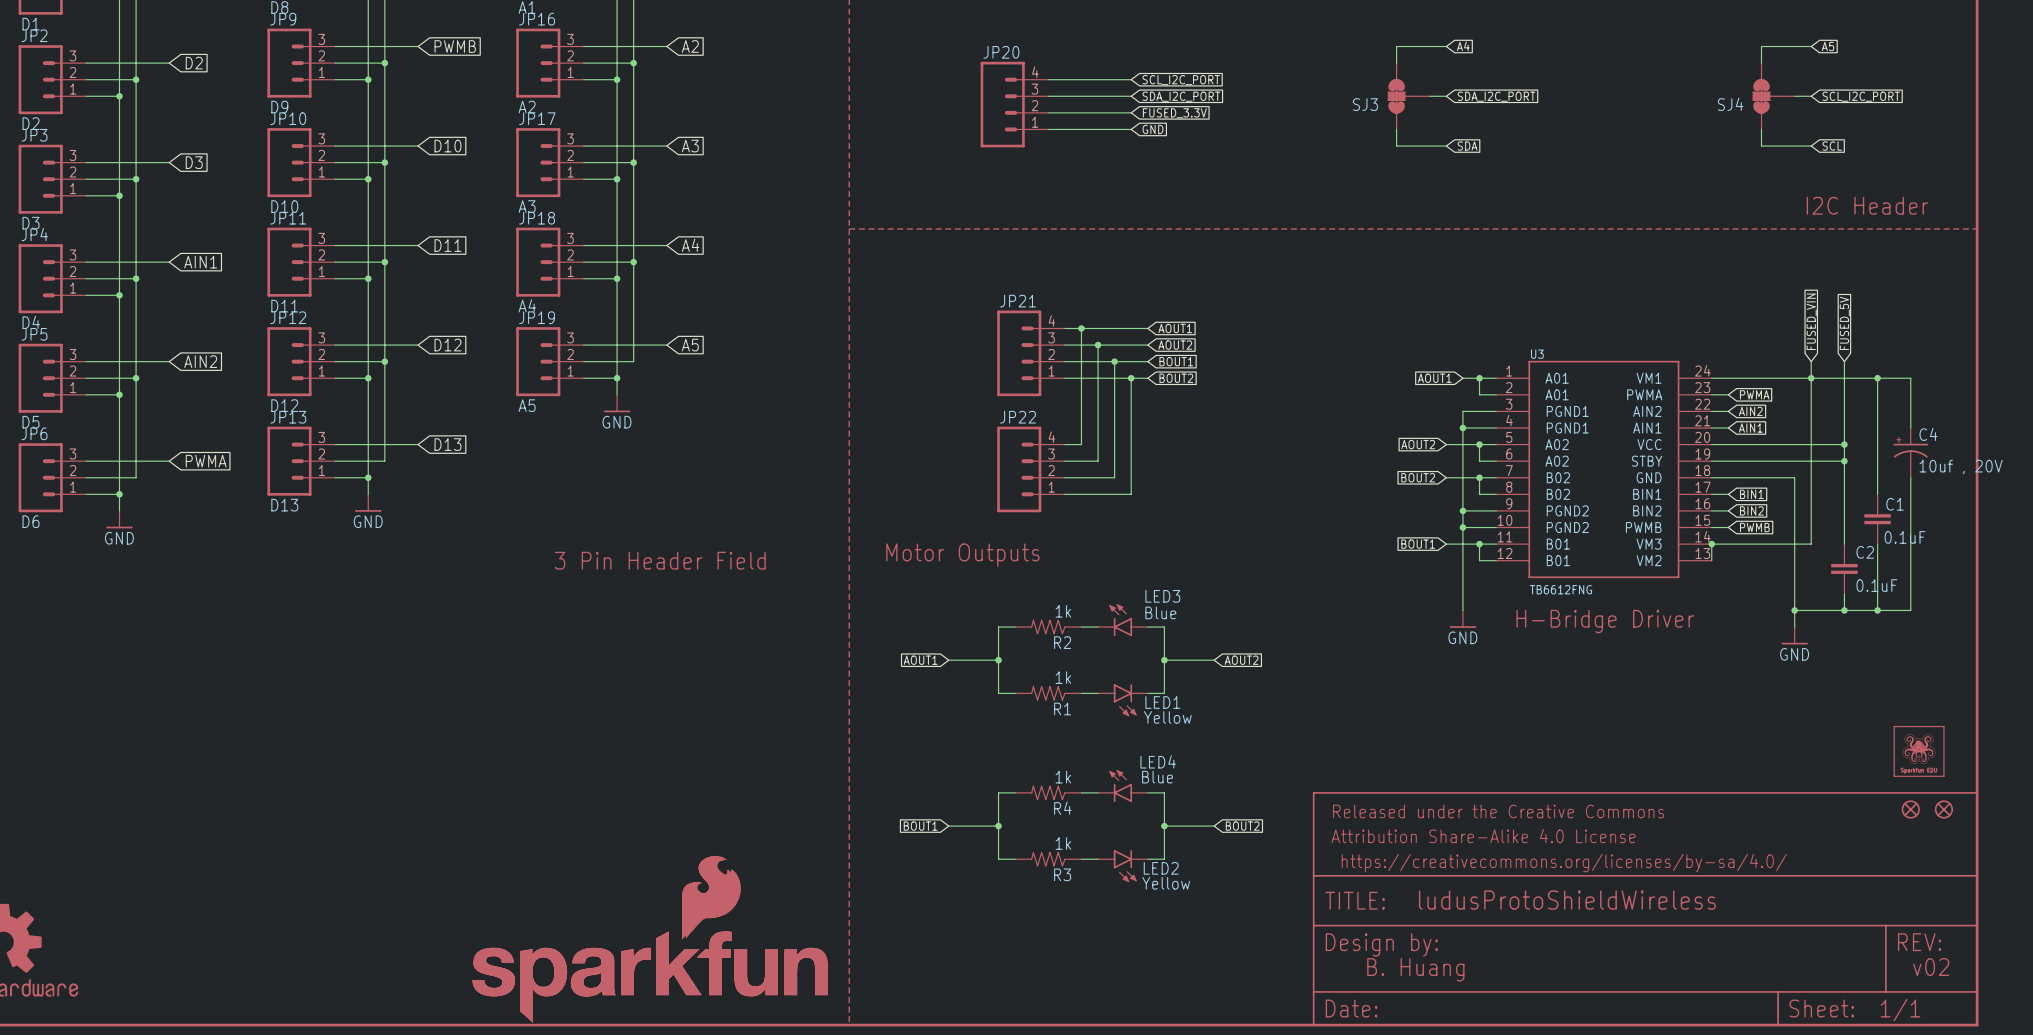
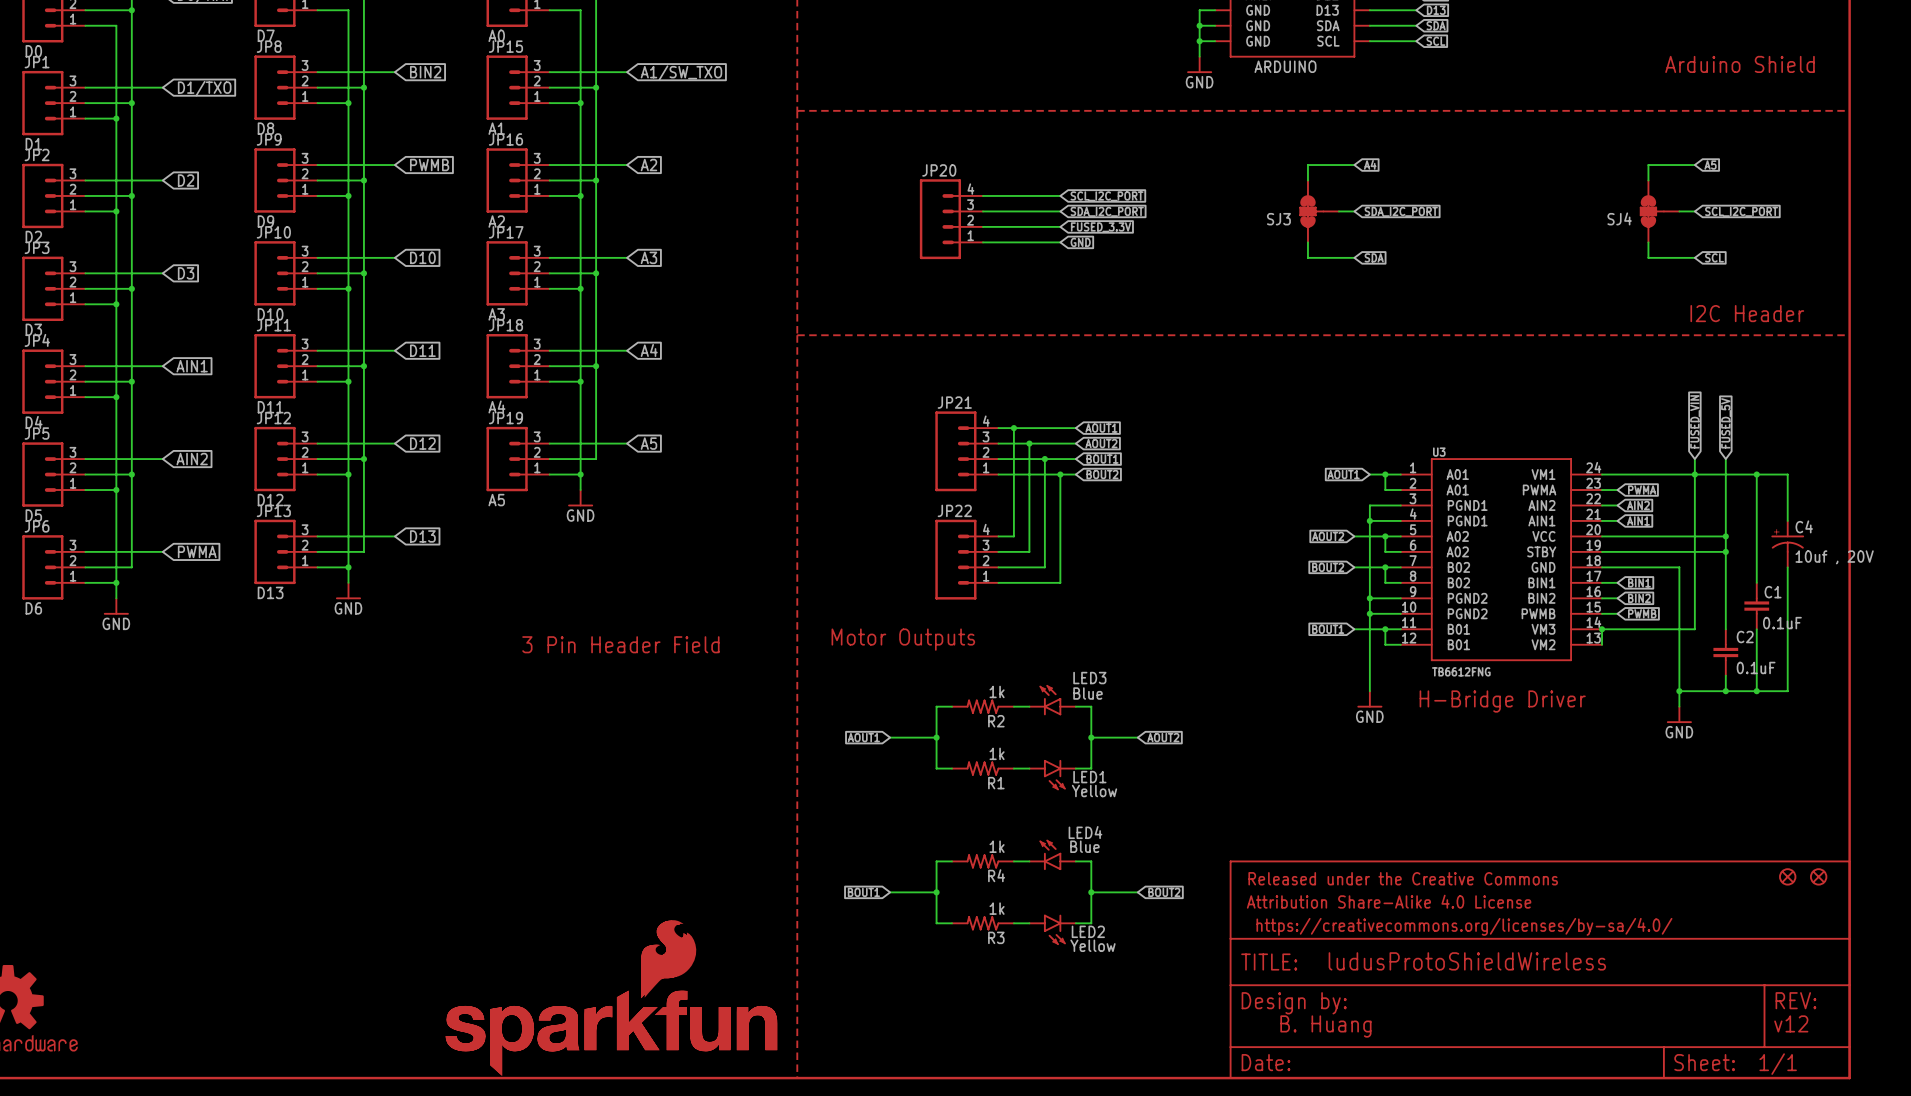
part: (1919, 751) -> none
text: v02 (1931, 967) -> v12 (1791, 1023)

